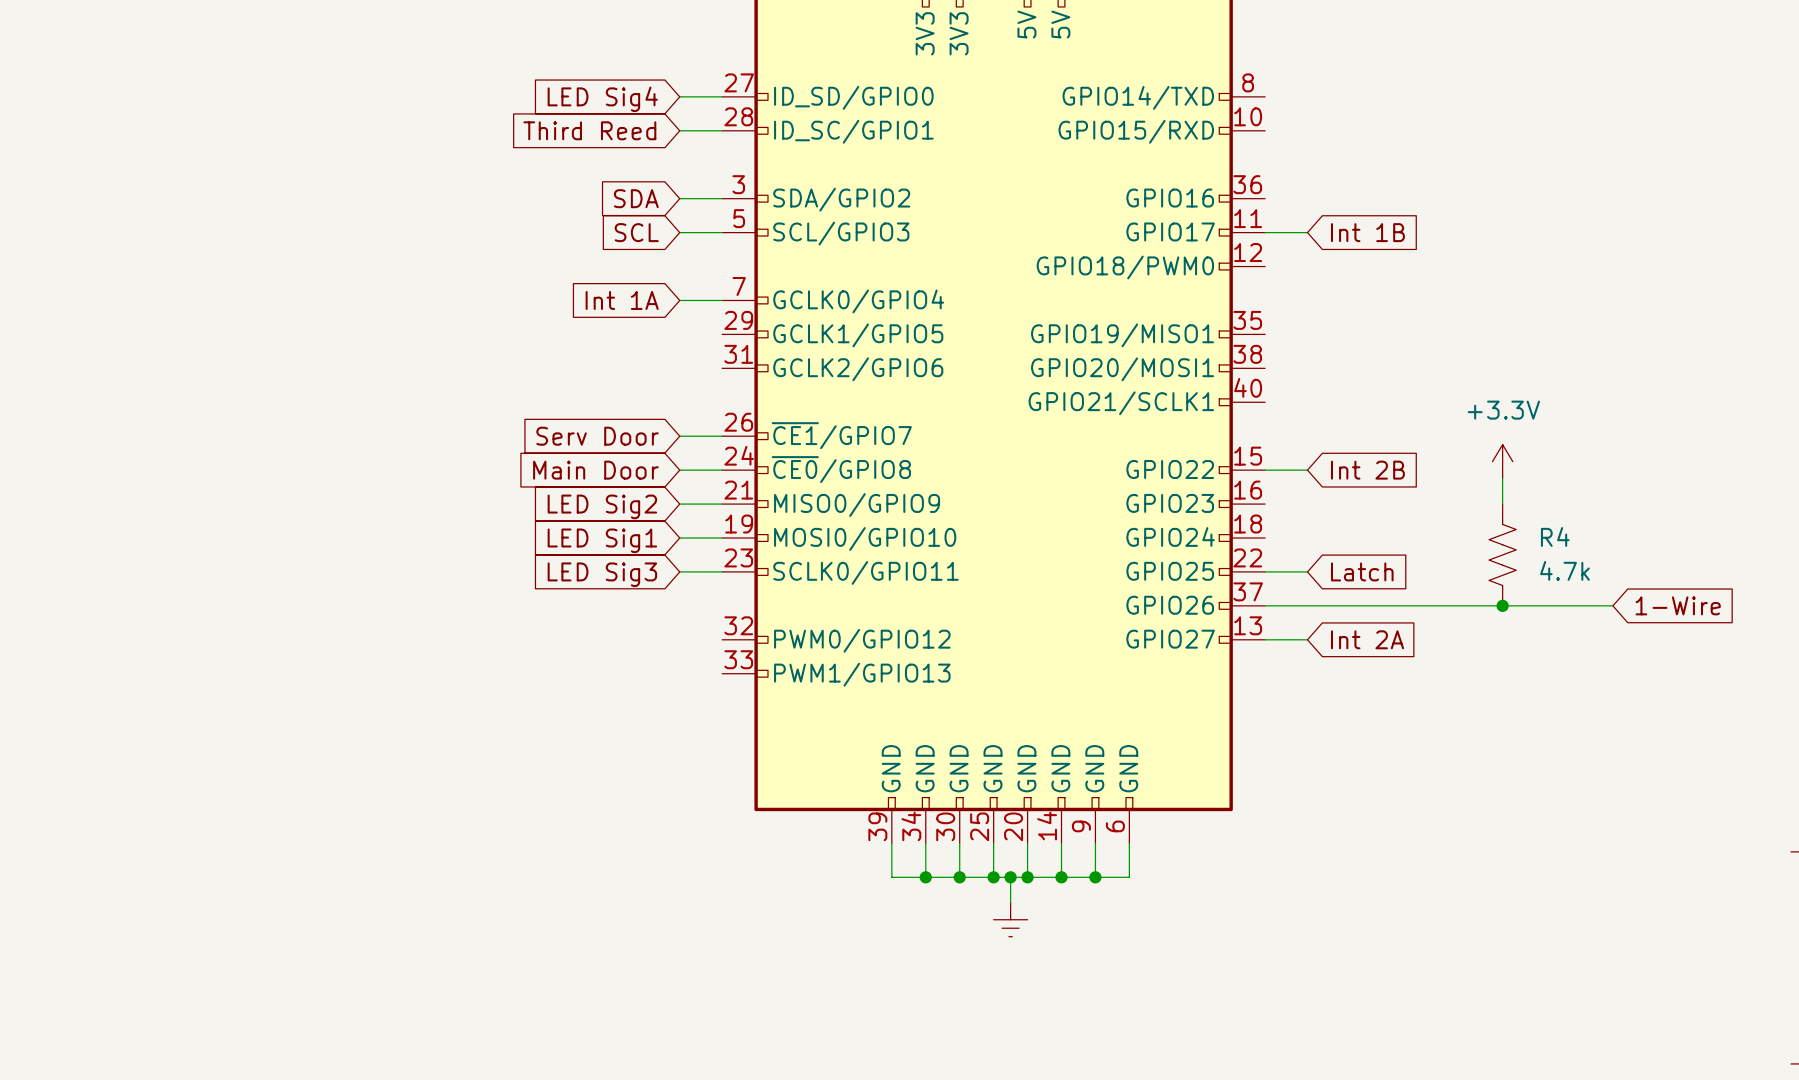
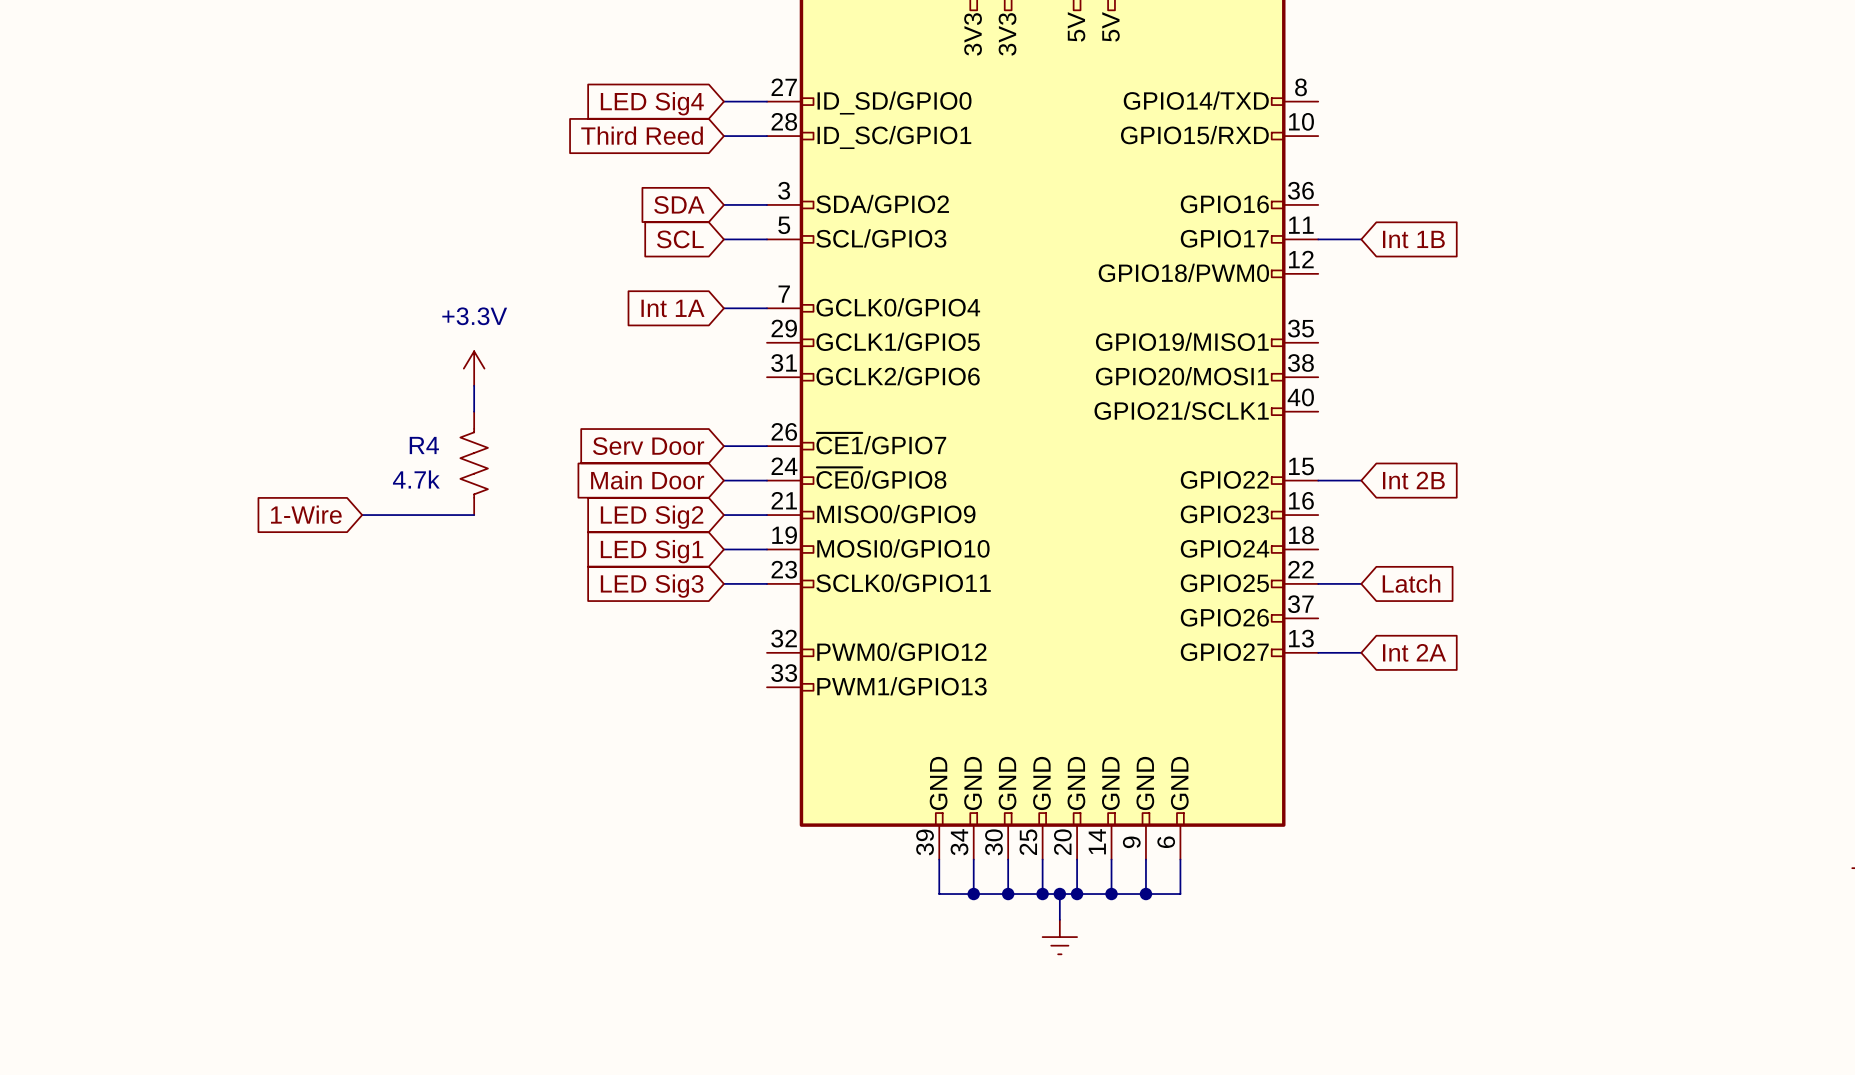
power symbol: none -> +3.3V (474, 368)
wire: none -> (474, 385) (474, 411)
power symbol: +3.3V (1502, 461) -> none
wire: (1502, 478) (1502, 504) -> none
global label: none -> 1-Wire (306, 514)
wire: none -> (362, 515) (474, 515)
R4 flip: as is (1502, 554) -> left-right (474, 463)
R4 position: (1502, 554) -> (474, 463)
wire: (1265, 605) (1612, 605) -> none
junction: (1502, 605) -> none
global label: 1-Wire (1678, 605) -> none

